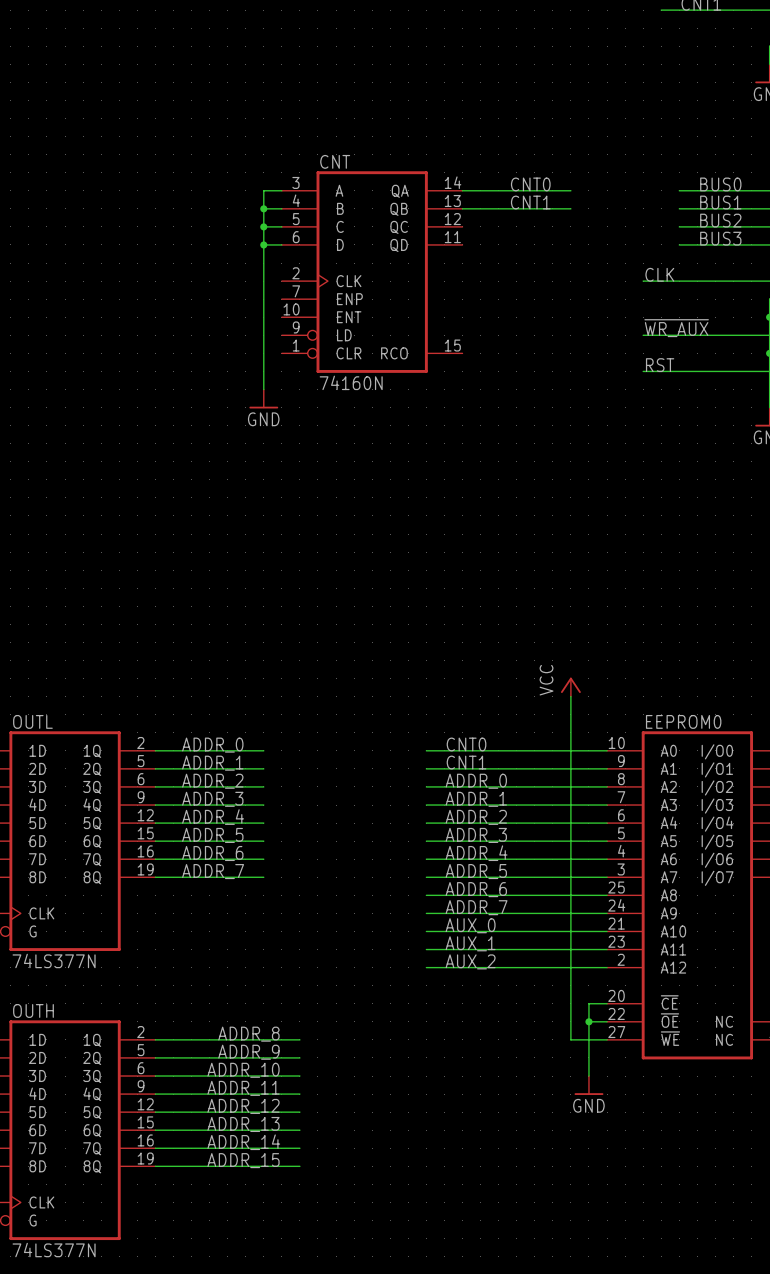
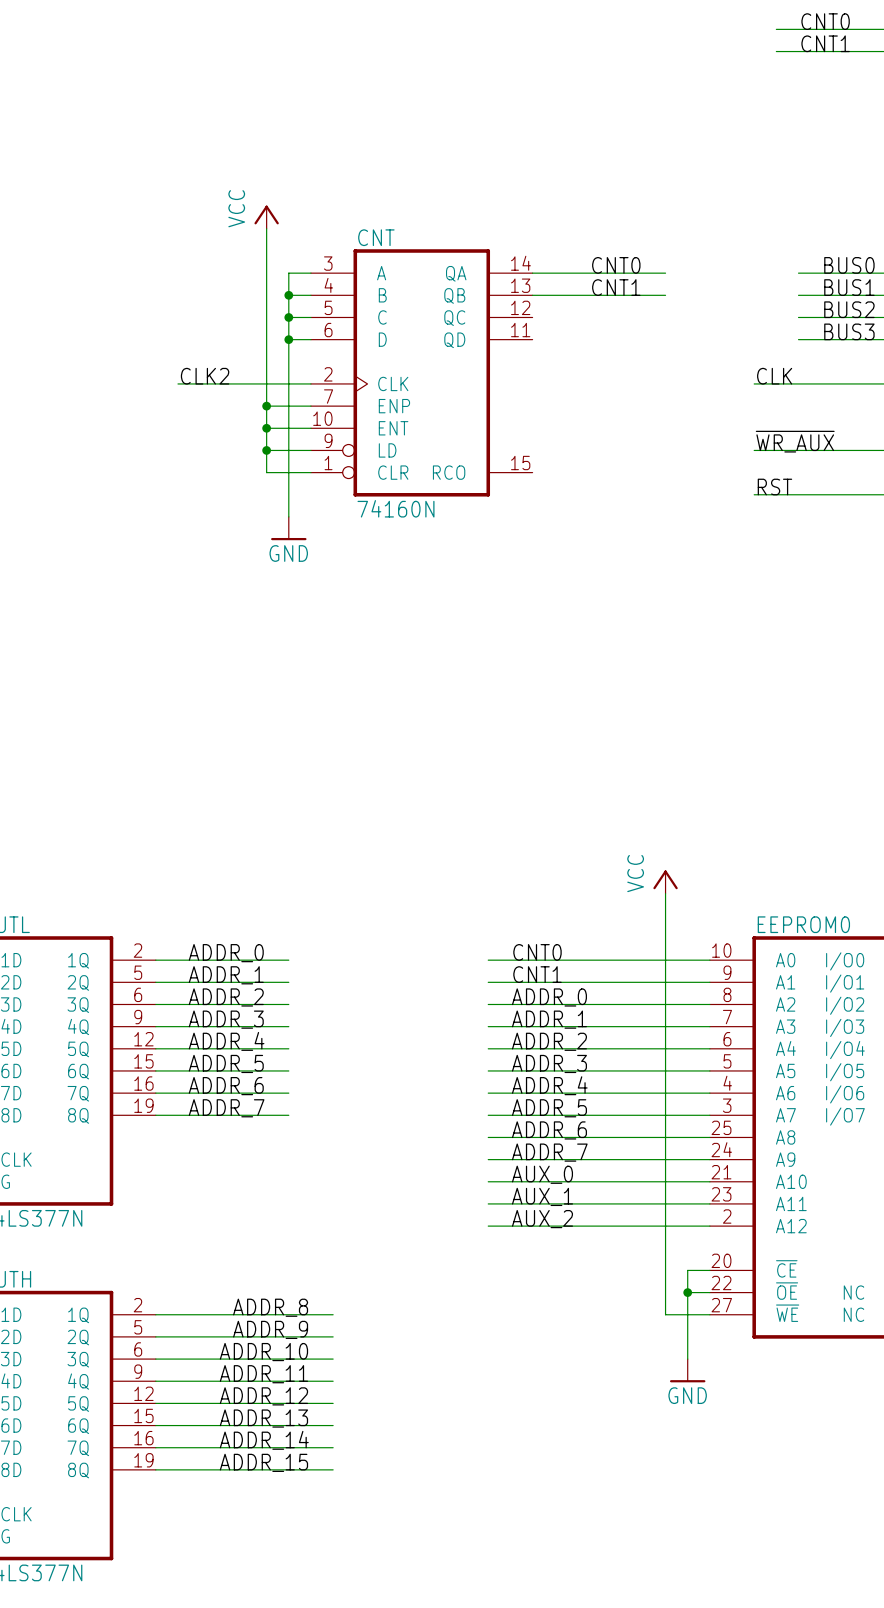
power symbol: none -> VCC (266, 217)
wire: none -> (266, 228) (266, 472) (310, 472)
label: none -> CLK2 (205, 376)
wire: none -> (177, 383) (310, 383)
wire: none -> (266, 406) (310, 406)
junction: none -> (266, 406)
wire: none -> (266, 428) (310, 428)
junction: none -> (266, 428)
wire: none -> (266, 450) (310, 450)
junction: none -> (266, 450)

